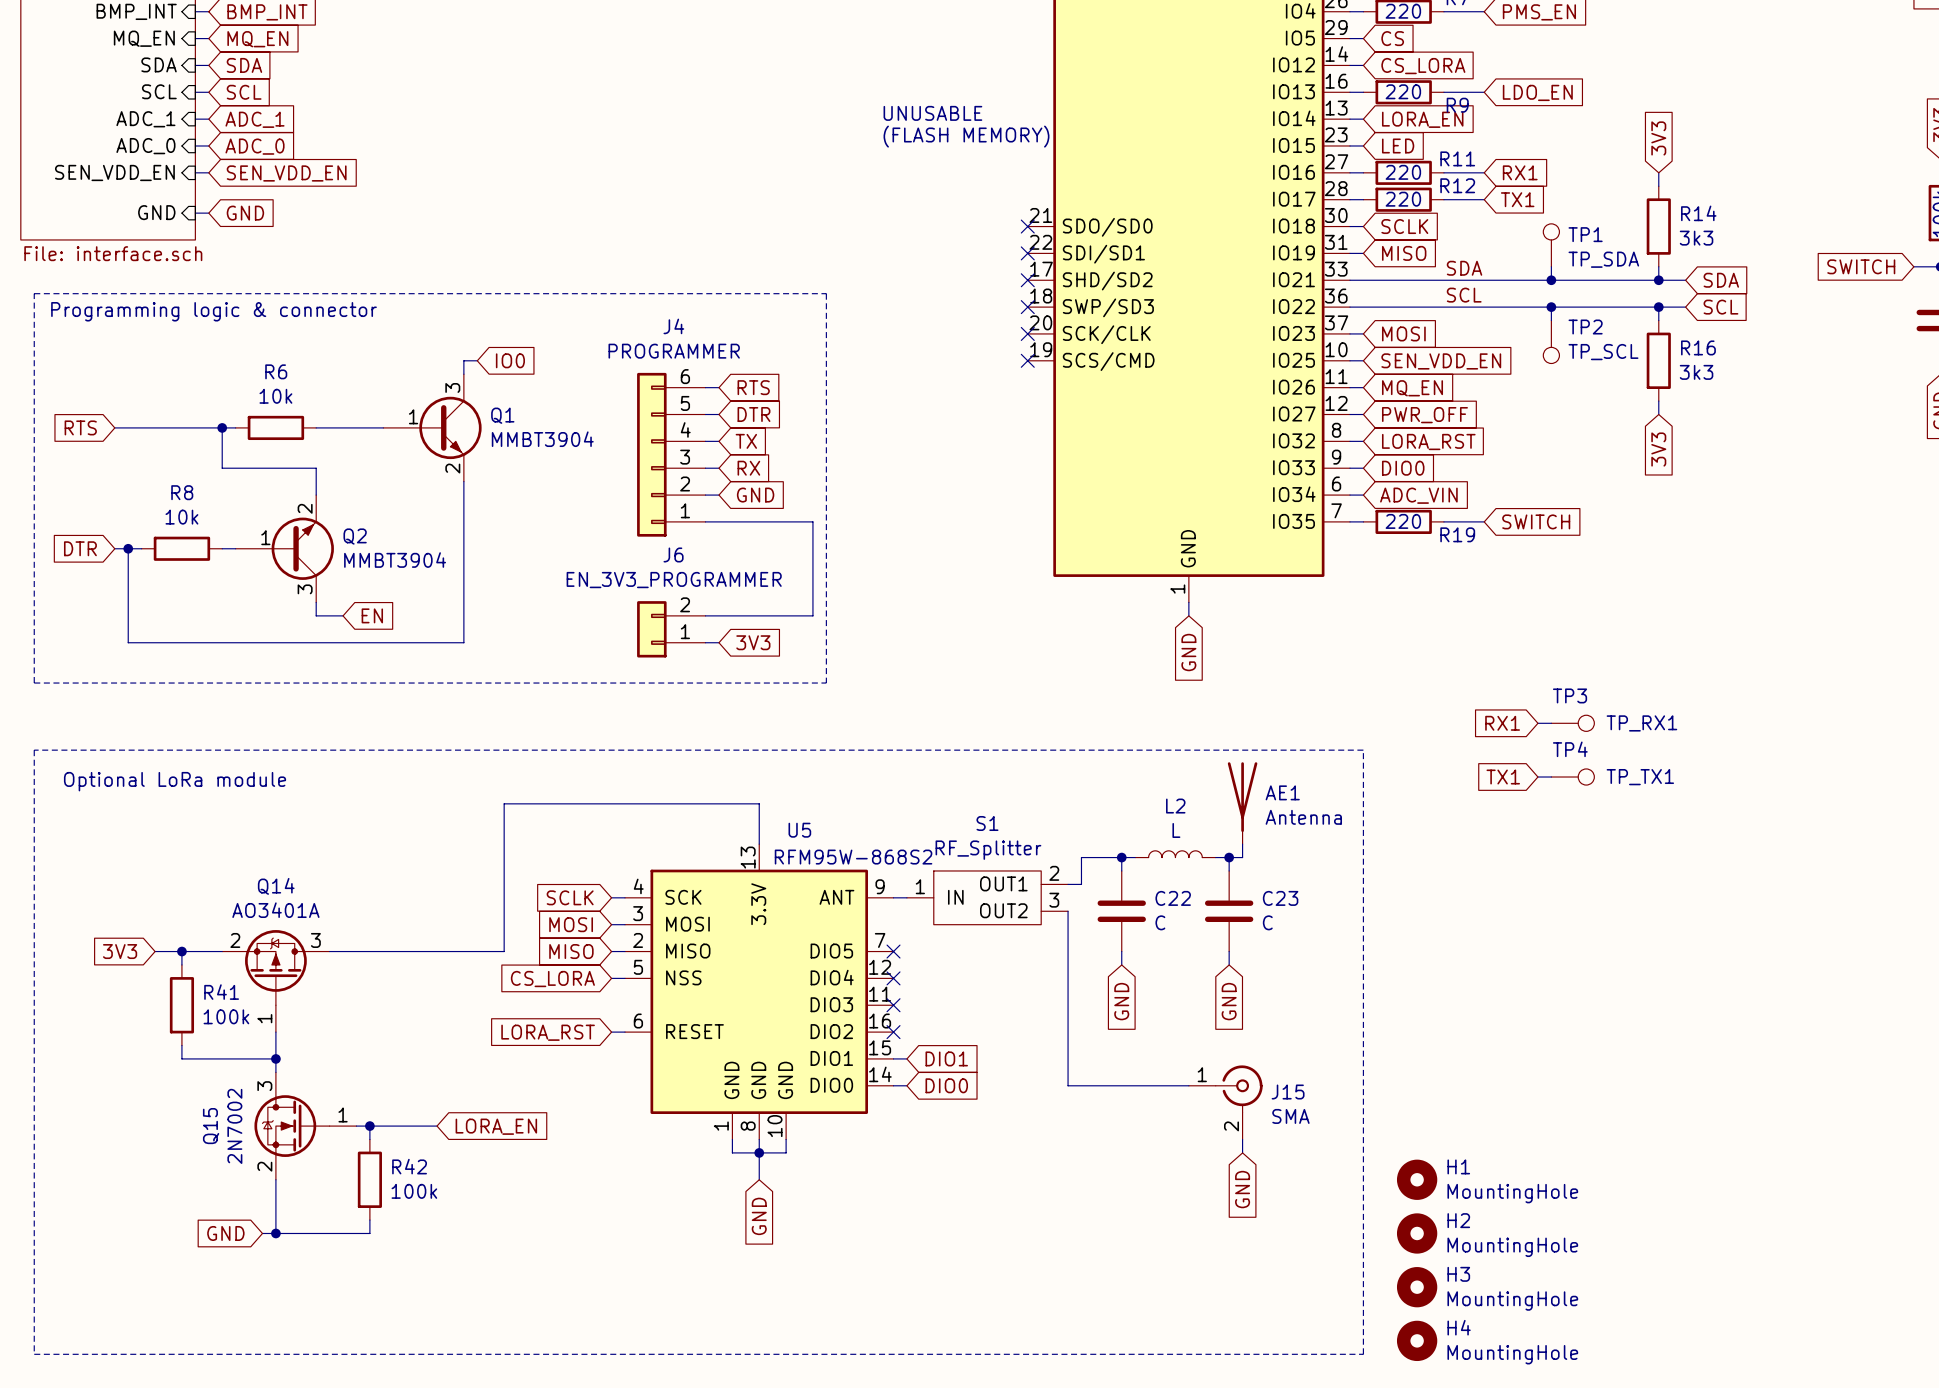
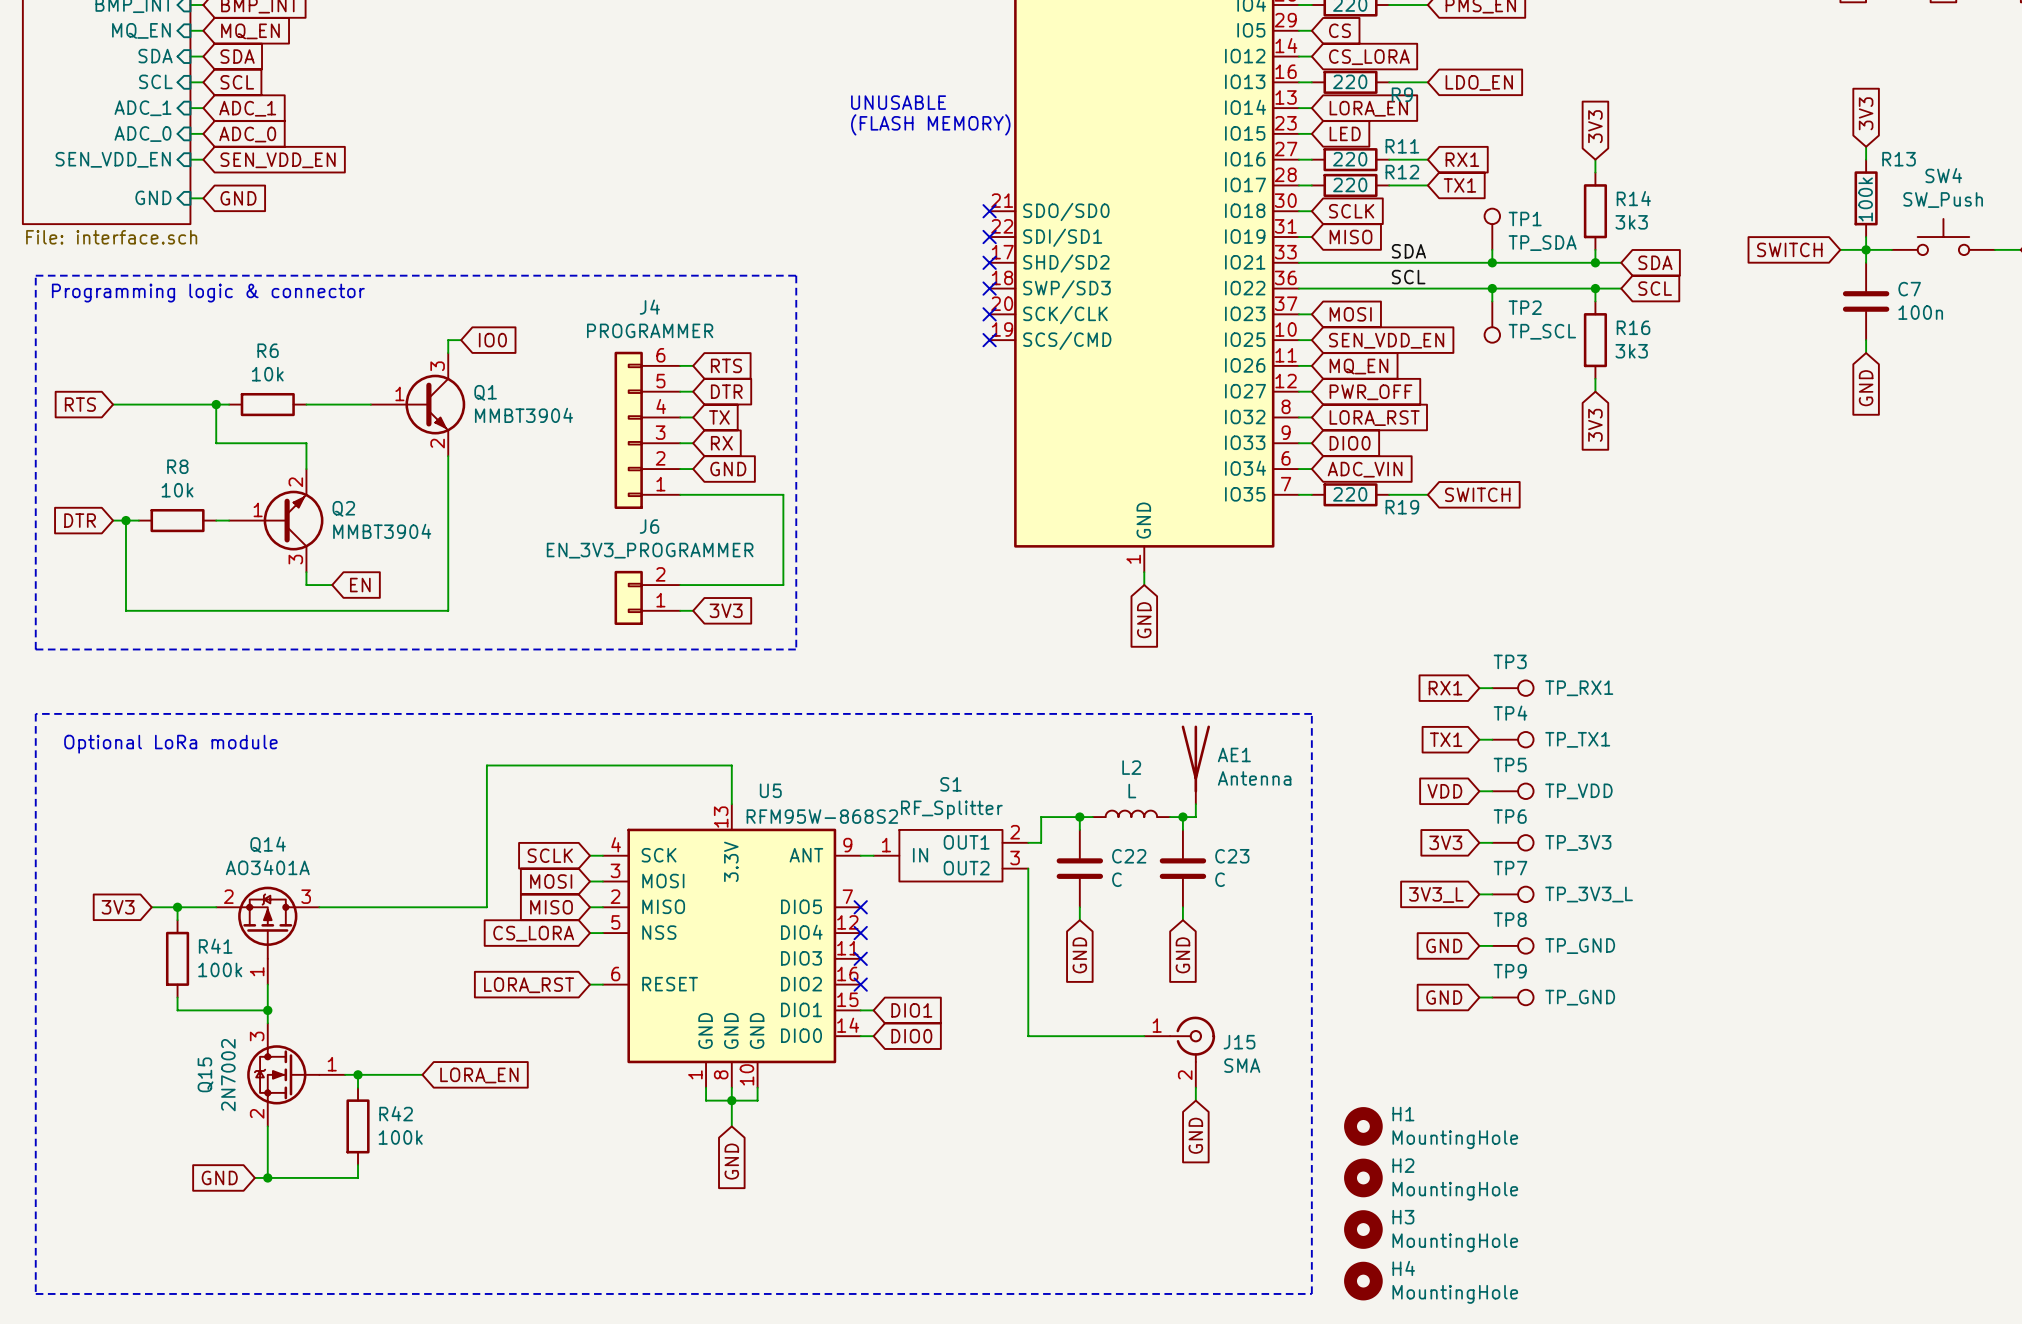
global label: none -> VDD (1444, 791)
wire: none -> (1479, 791) (1492, 791)
TP5: none -> TP_VDD (1512, 791)
global label: none -> 3V3 (1445, 842)
wire: none -> (1479, 842) (1492, 842)
TP6: none -> TP_3V3 (1512, 842)
global label: none -> 3V3_L (1436, 895)
wire: none -> (1479, 894) (1492, 894)
TP7: none -> TP_3V3_L (1512, 894)
global label: none -> GND (1444, 945)
wire: none -> (1479, 945) (1492, 945)
TP8: none -> TP_GND (1512, 945)
global label: none -> GND (1444, 997)
wire: none -> (1479, 997) (1492, 997)
TP9: none -> TP_GND (1512, 997)

